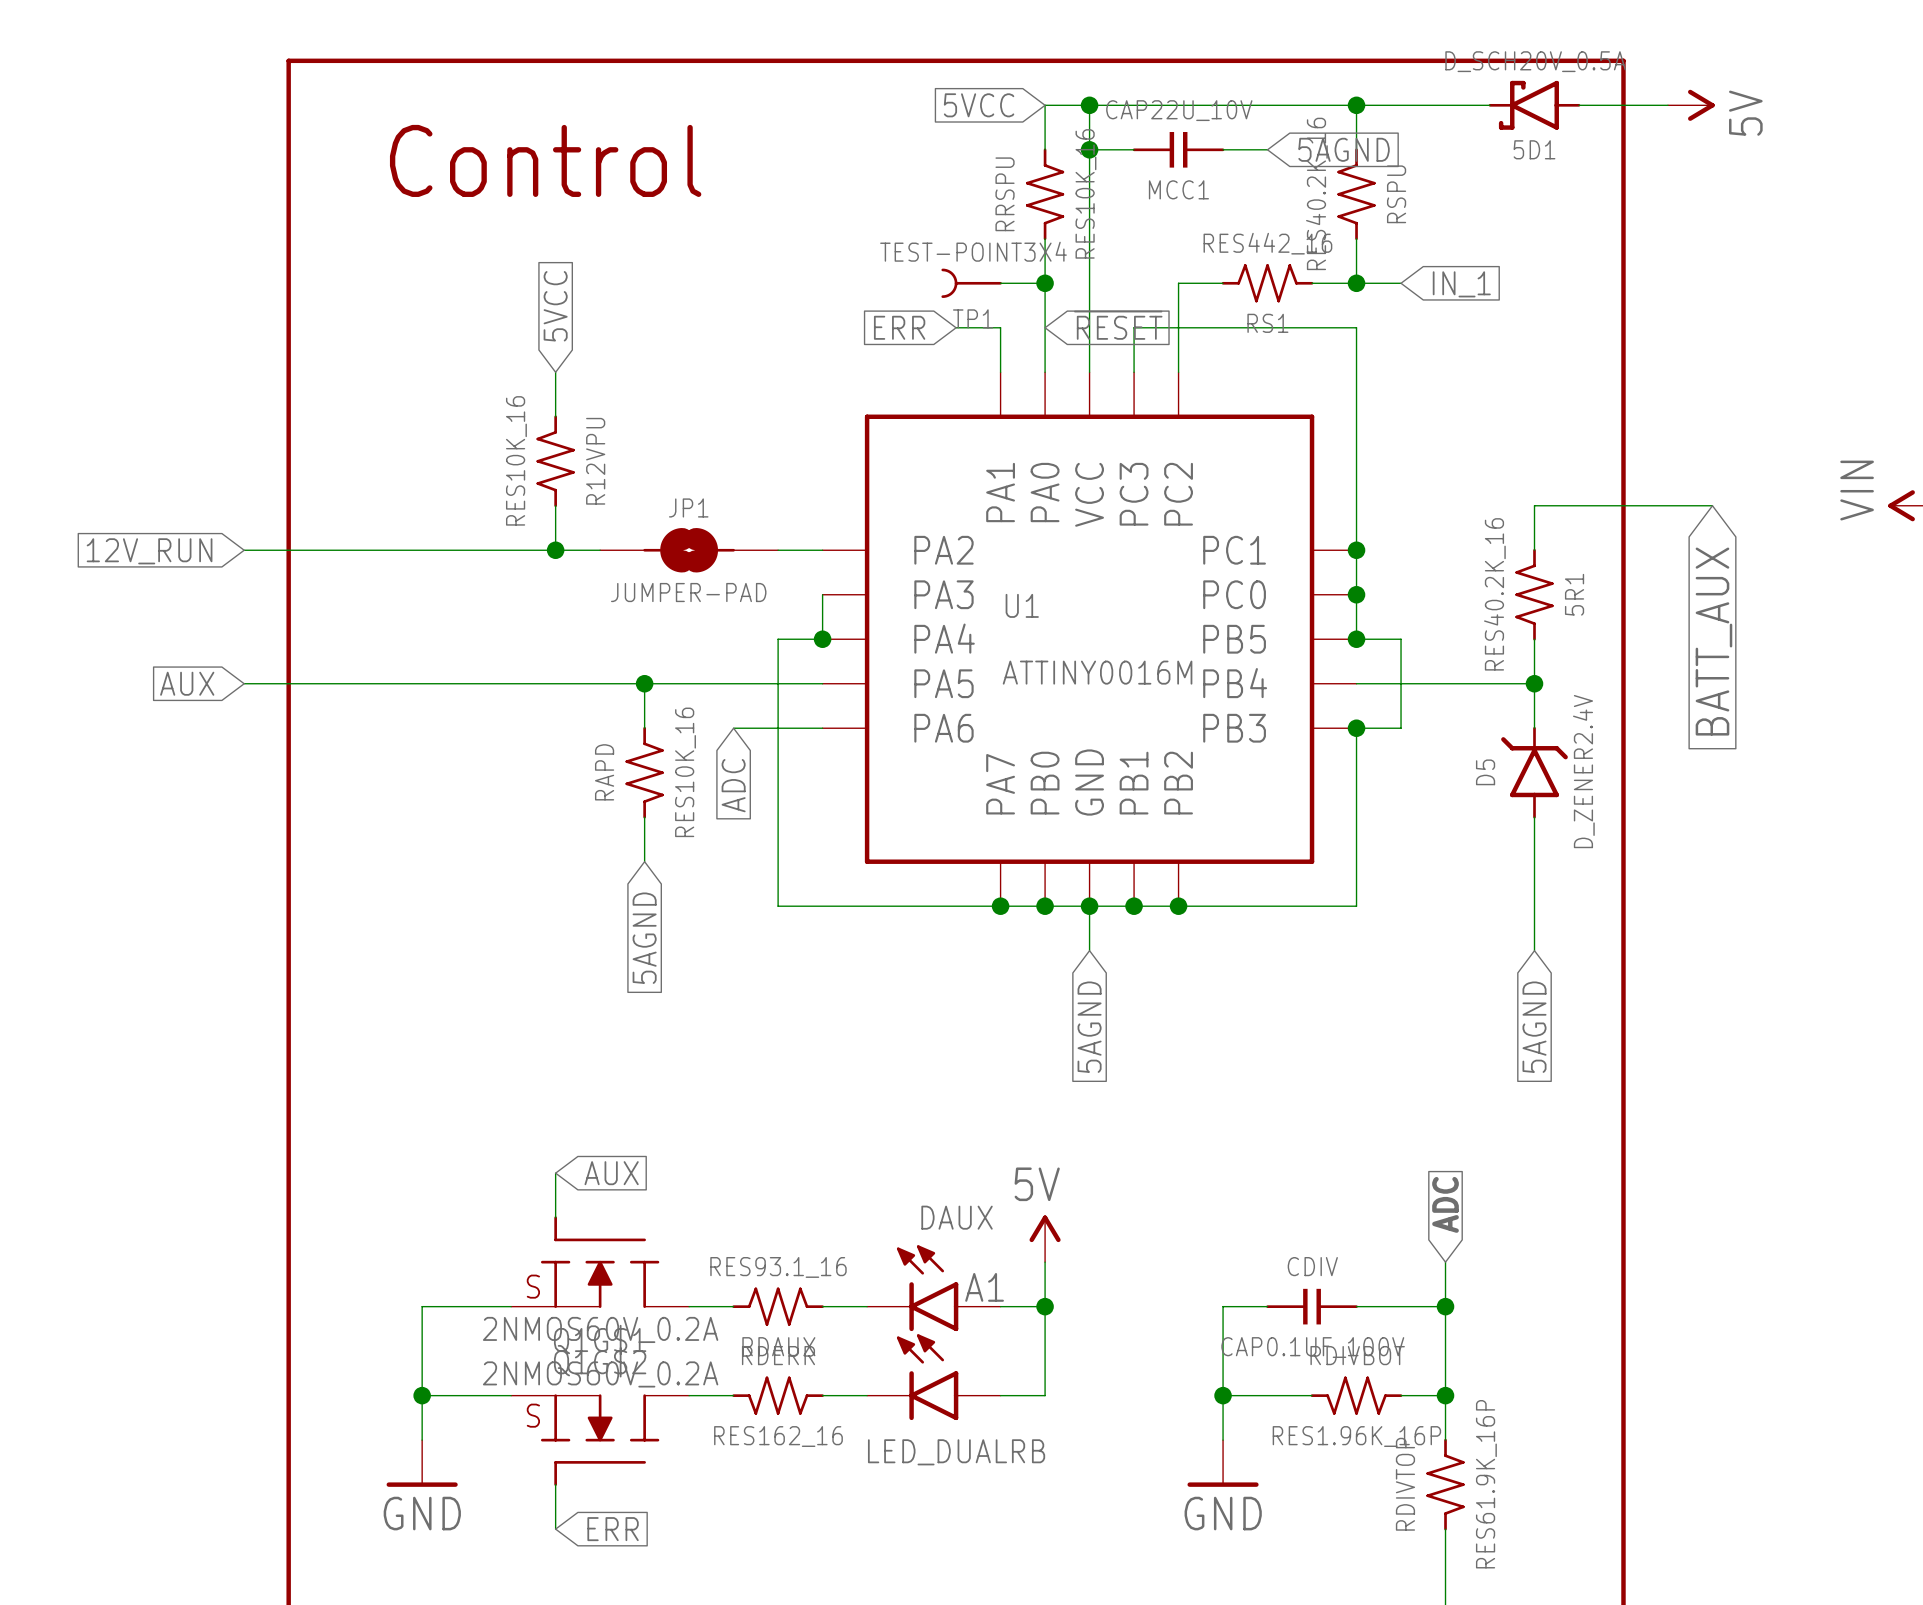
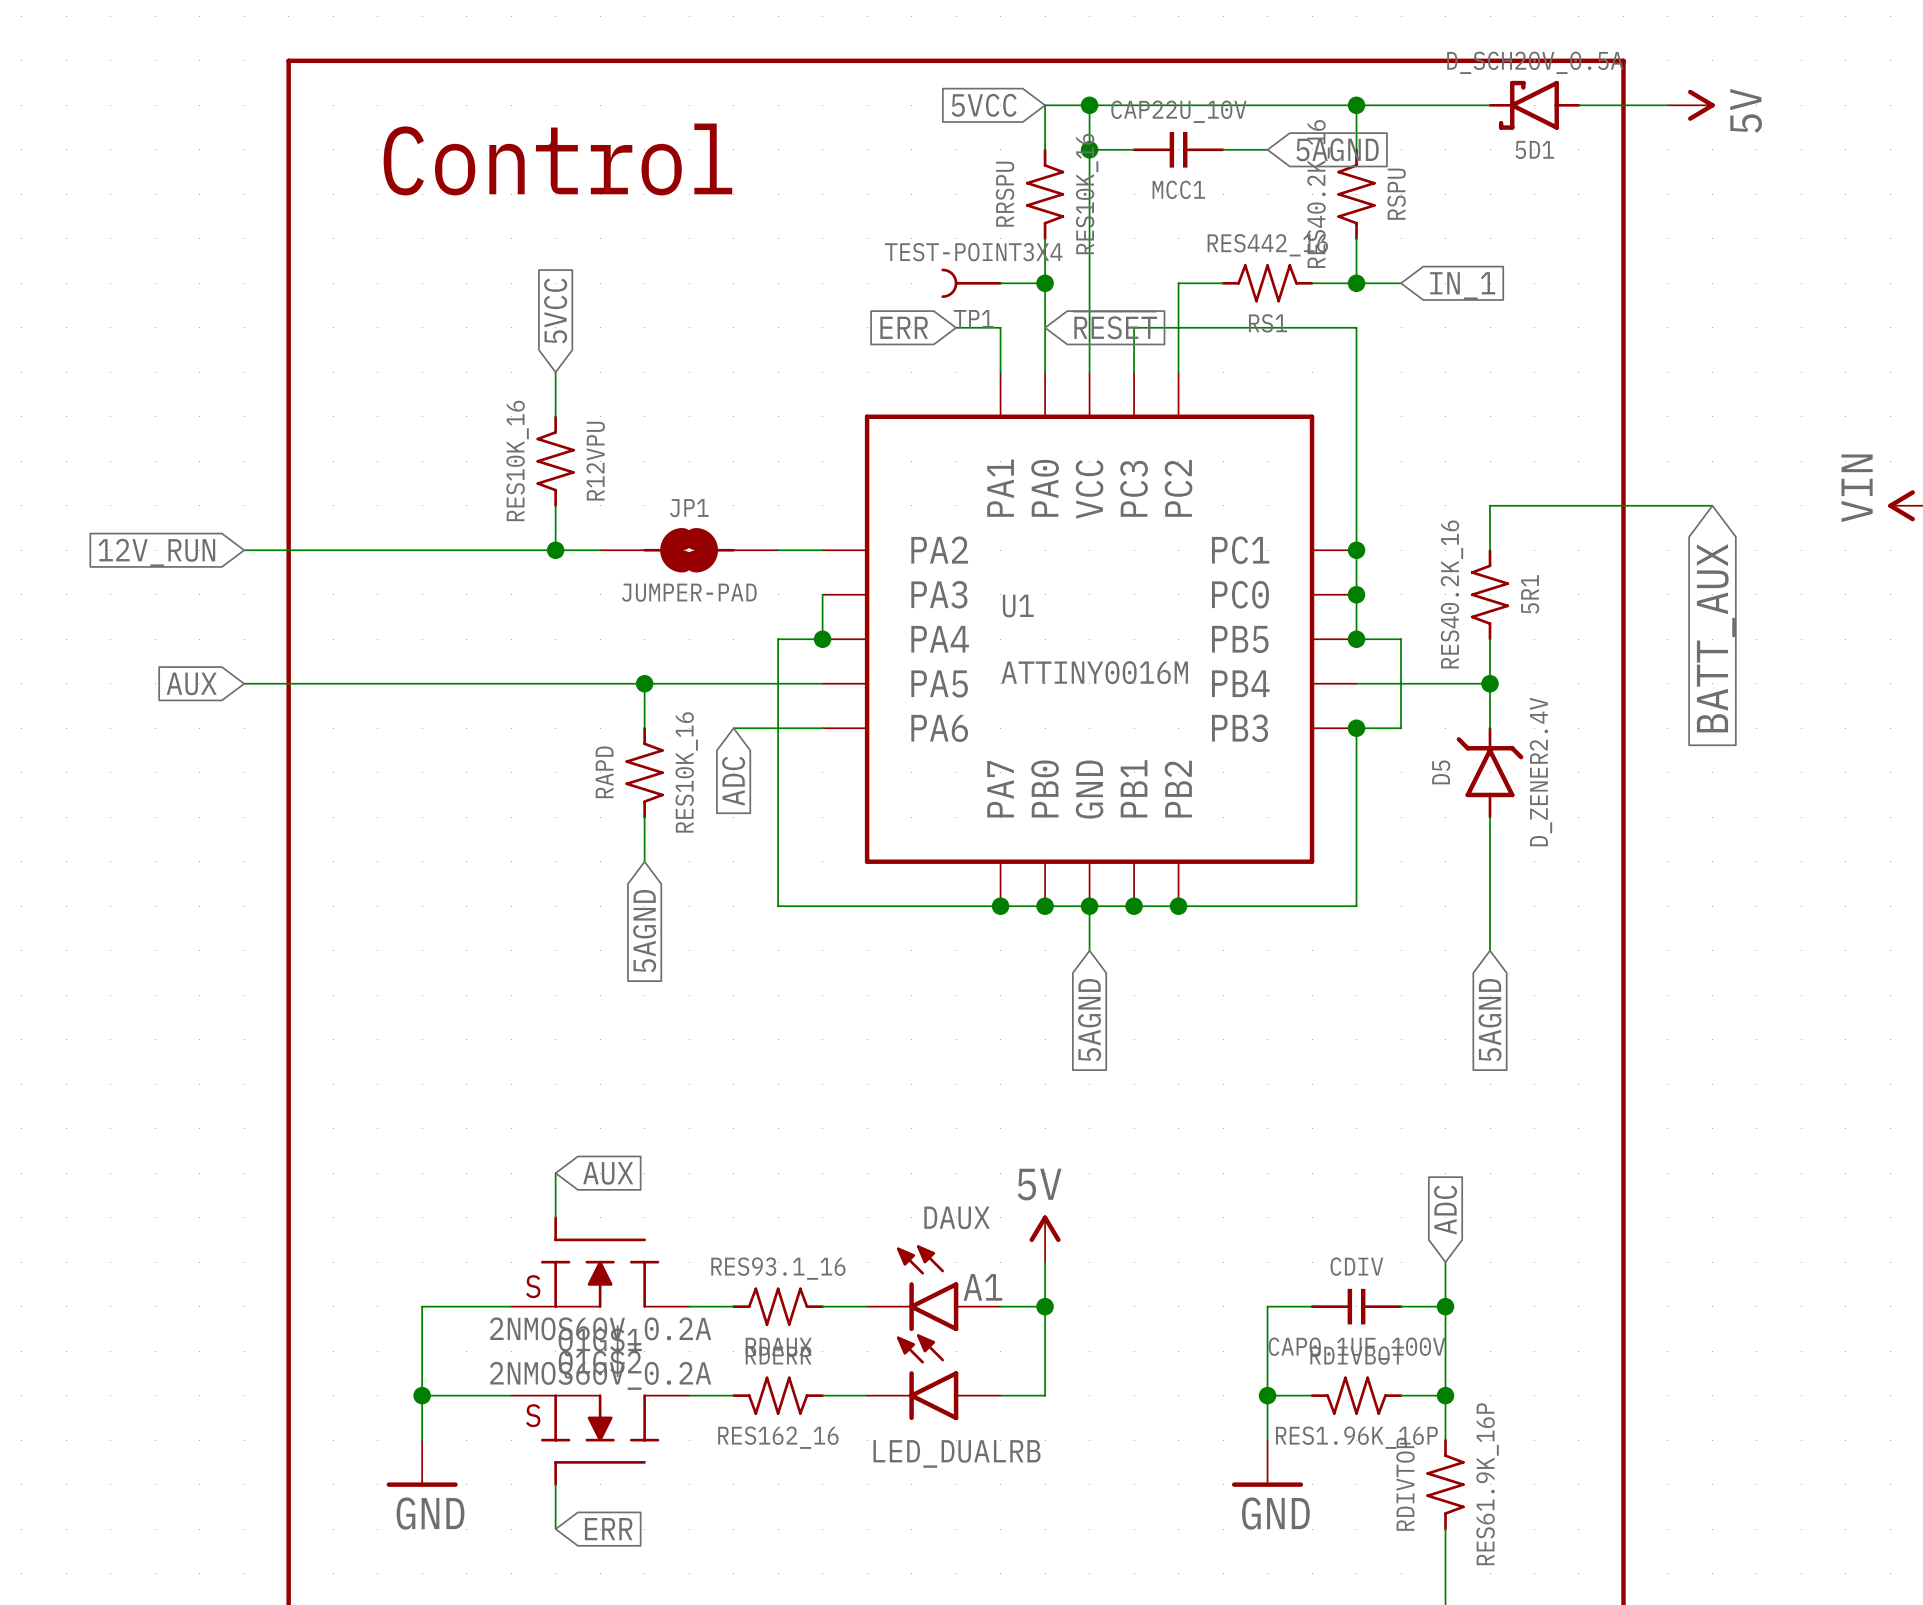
wire: (1534, 505) (1534, 550) -> (1534, 505) (1490, 505) (1490, 550)
5R1 position: (1534, 594) -> (1490, 594)
wire: (1534, 639) (1534, 728) -> (1490, 639) (1490, 728)
wire: (1490, 683) (1534, 683) -> none
junction position: (1534, 683) -> (1490, 683)
D5 position: (1534, 772) -> (1490, 772)
wire: (1534, 817) (1534, 950) -> (1490, 817) (1490, 950)
global label position: 5AGND (1534, 1027) -> 5AGND (1490, 1020)
wire: (1267, 1306) (1223, 1306) (1223, 1440) -> (1312, 1306) (1267, 1306) (1267, 1440)
CDIV position: (1312, 1306) -> (1356, 1306)
wire: (1223, 1395) (1267, 1395) -> none
junction position: (1223, 1395) -> (1267, 1395)
power symbol position: GND (1223, 1463) -> GND (1267, 1463)

